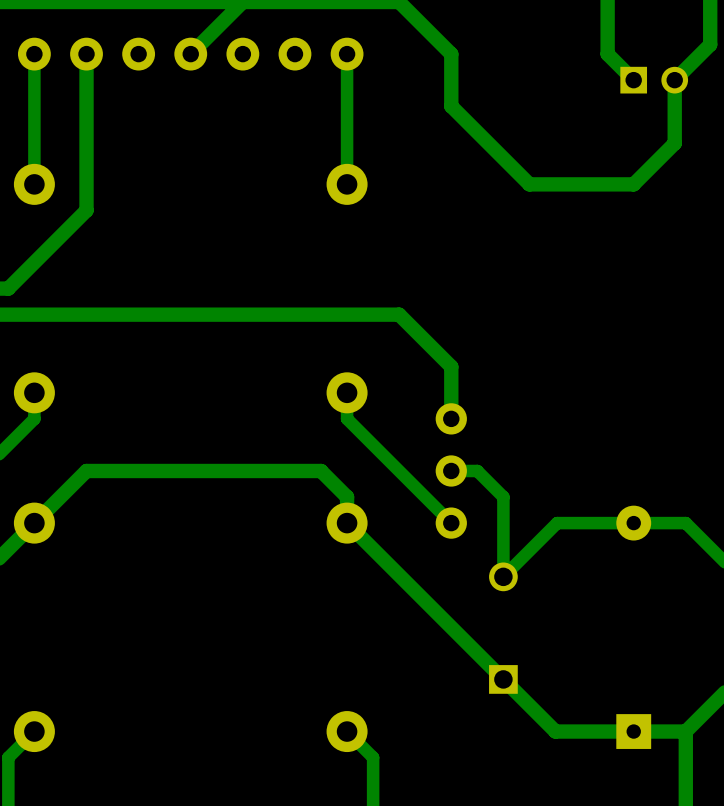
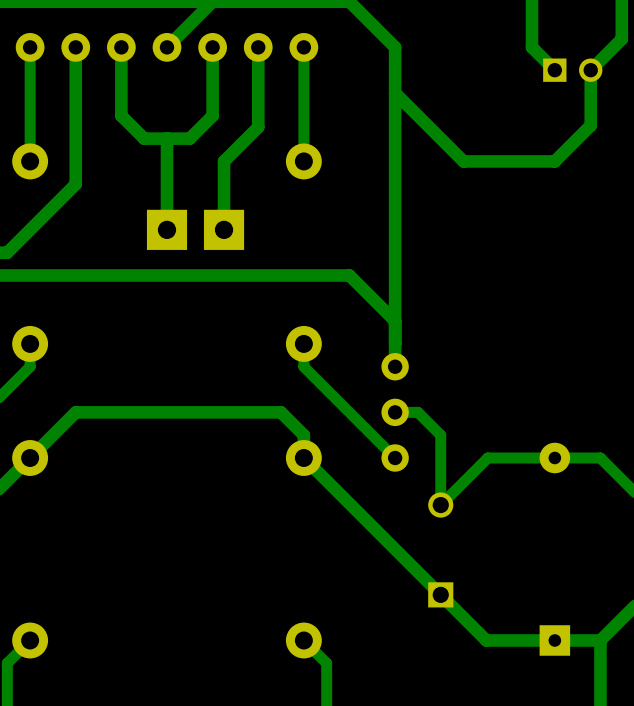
track: none -> (212, 47) (212, 115) (189, 138) (144, 138) (121, 115) (121, 47)
track: none -> (258, 47) (258, 127) (224, 161) (224, 229)
track: none -> (395, 92) (395, 321)
track: none -> (167, 138) (167, 229)
part: none -> (167, 229)
part: none -> (224, 229)

